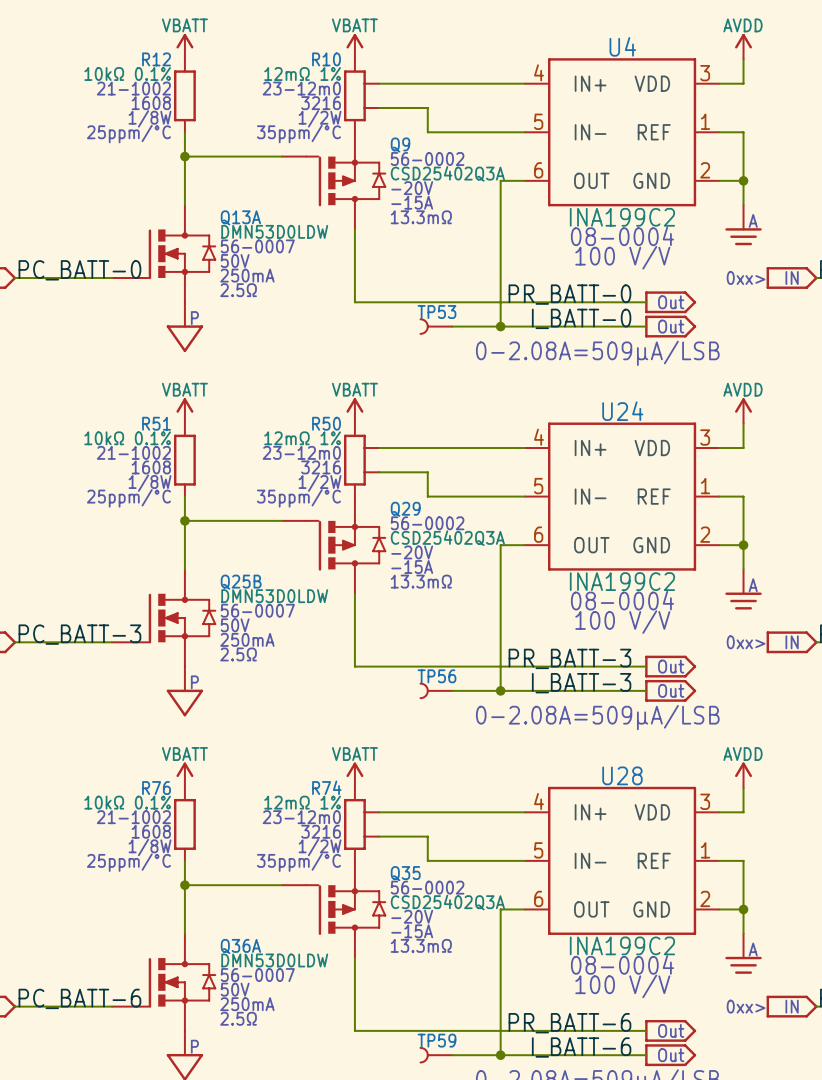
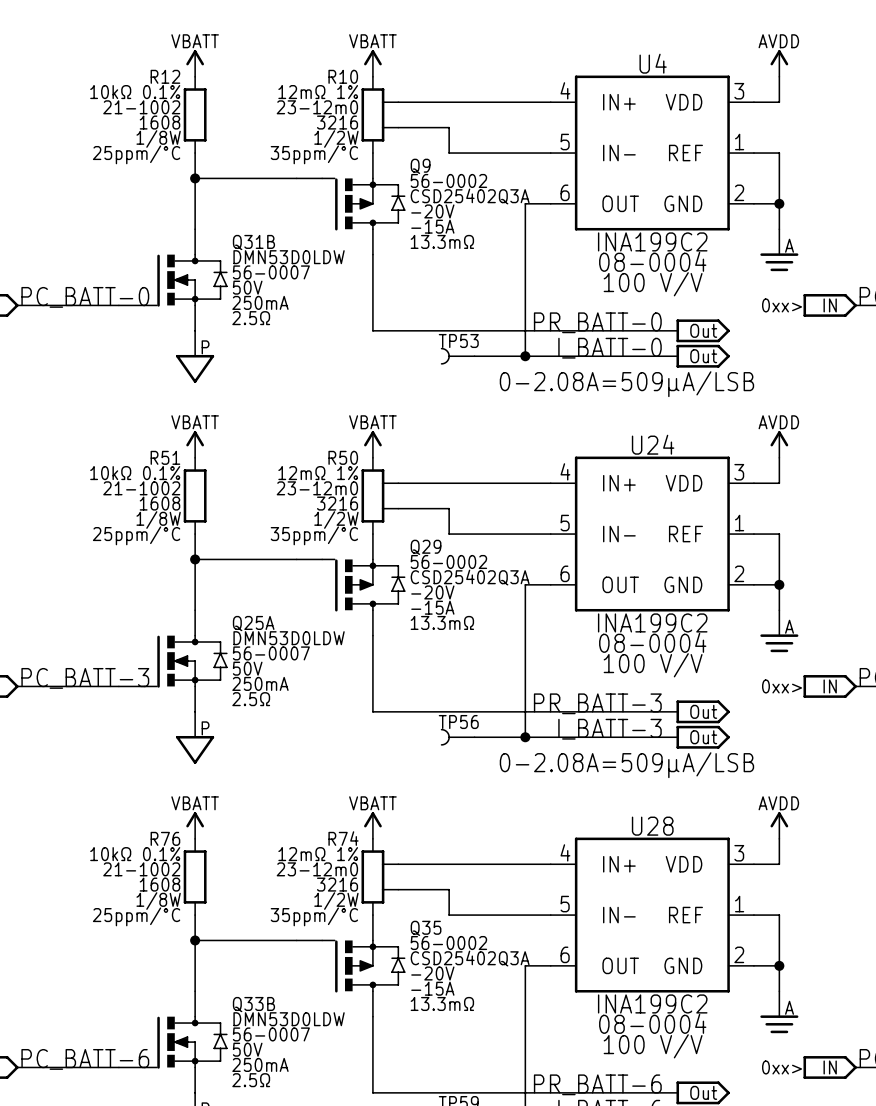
Q13A name: Q13A (240, 217) -> Q31B (253, 242)
Q25B name: Q25B (241, 582) -> Q25A (253, 623)
Q36A name: Q36A (240, 946) -> Q33B (253, 1004)

